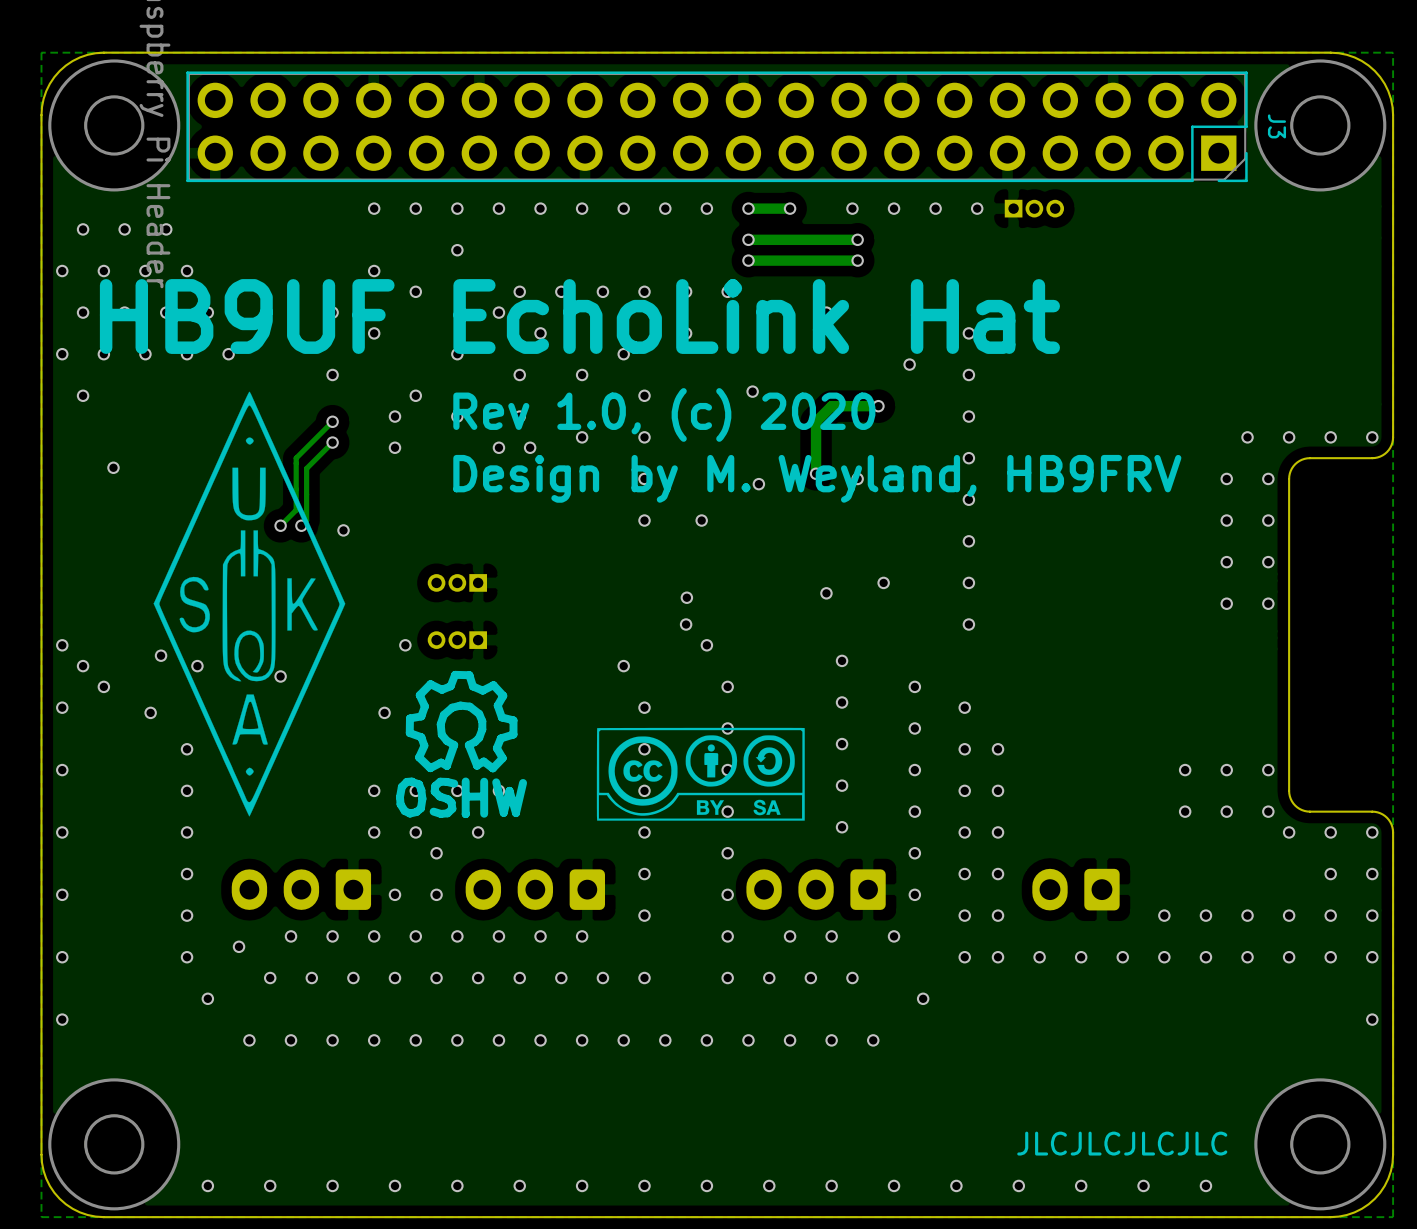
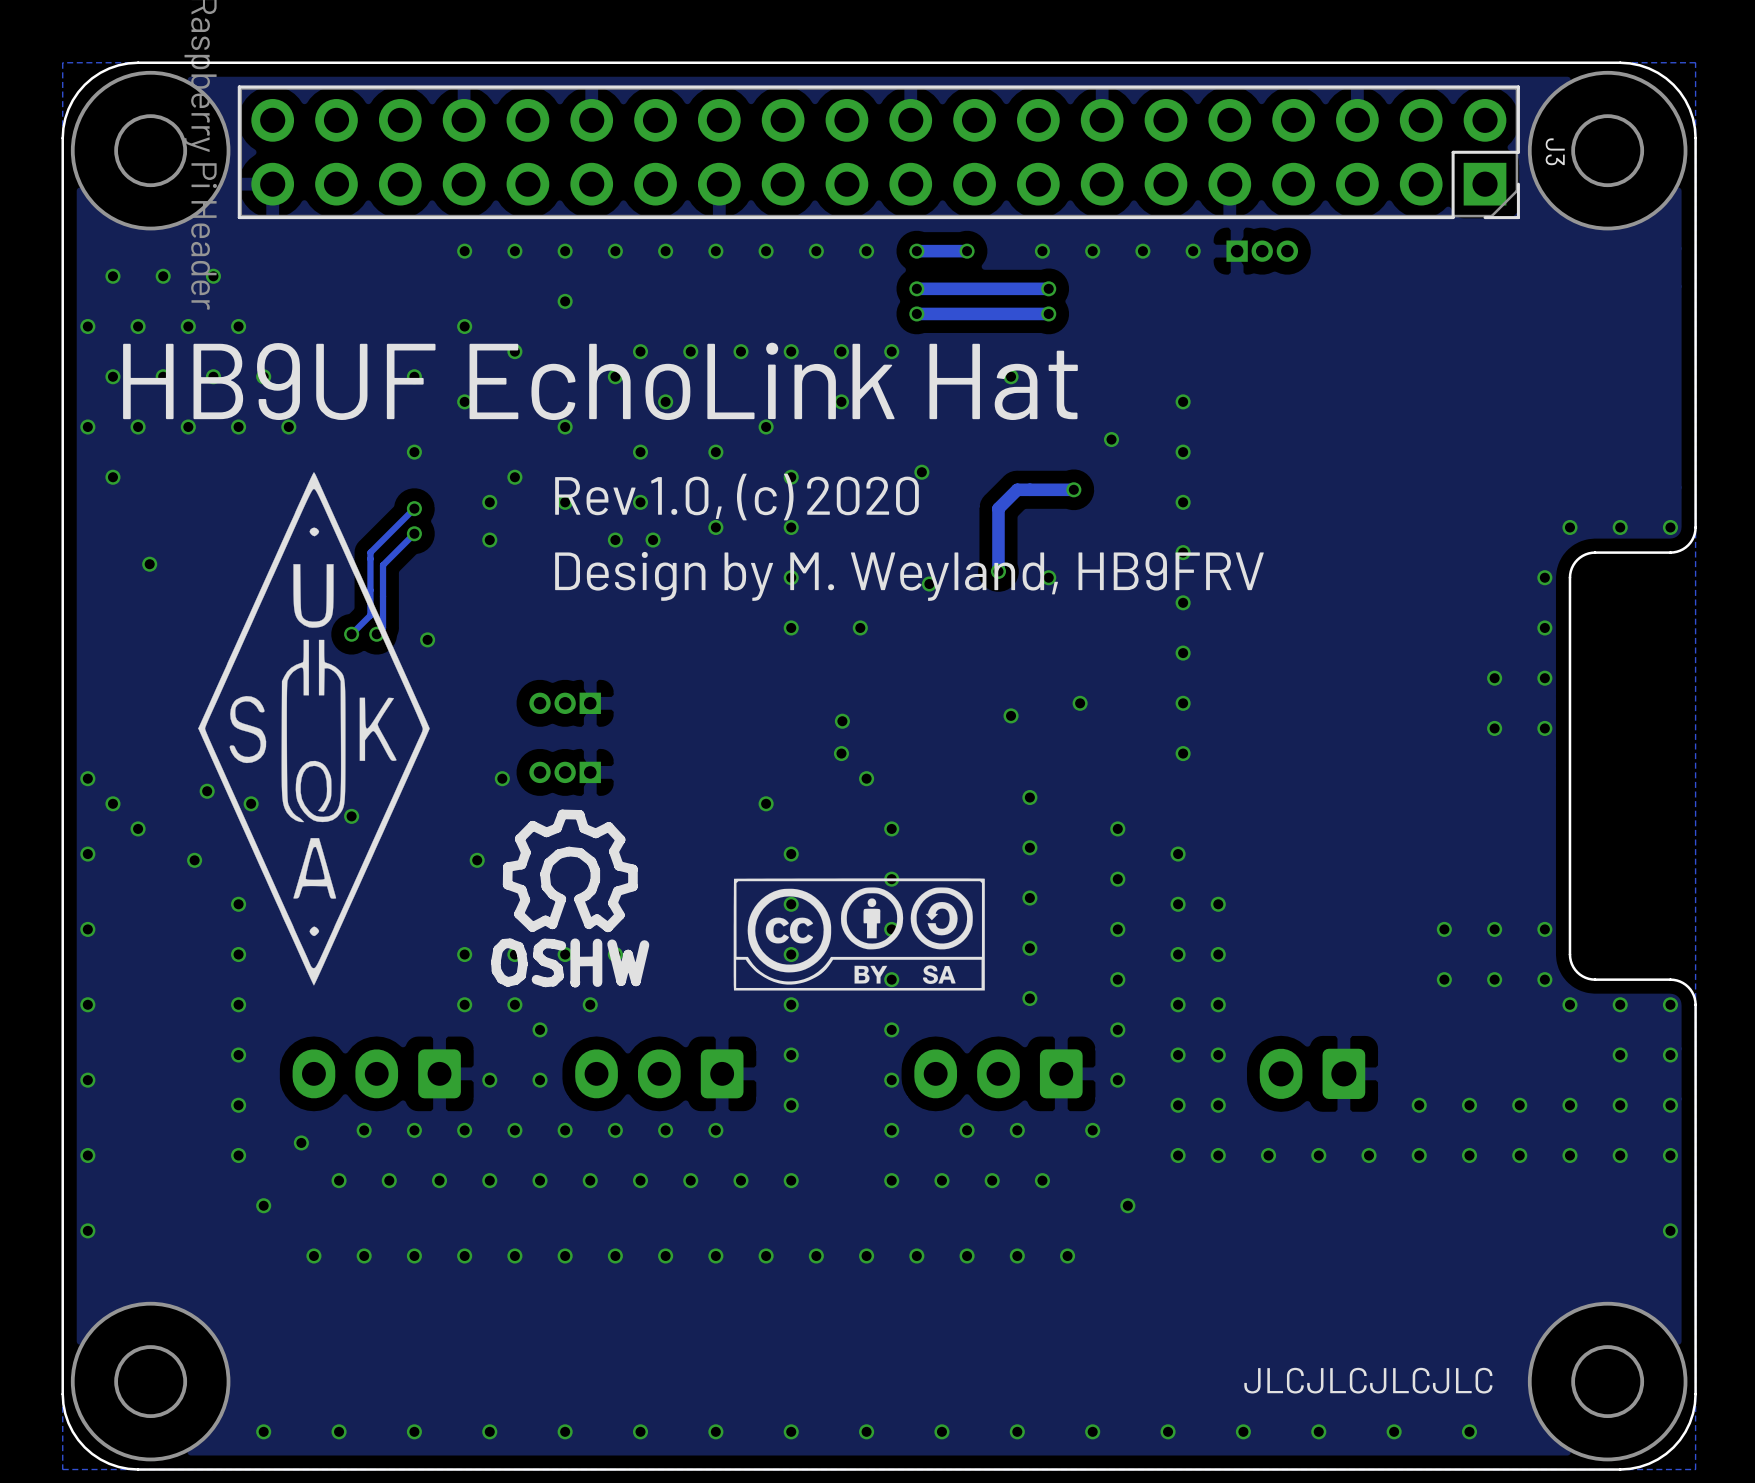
via: (1247, 437) -> none
via: (1226, 478) -> none
via: (1226, 520) -> none

